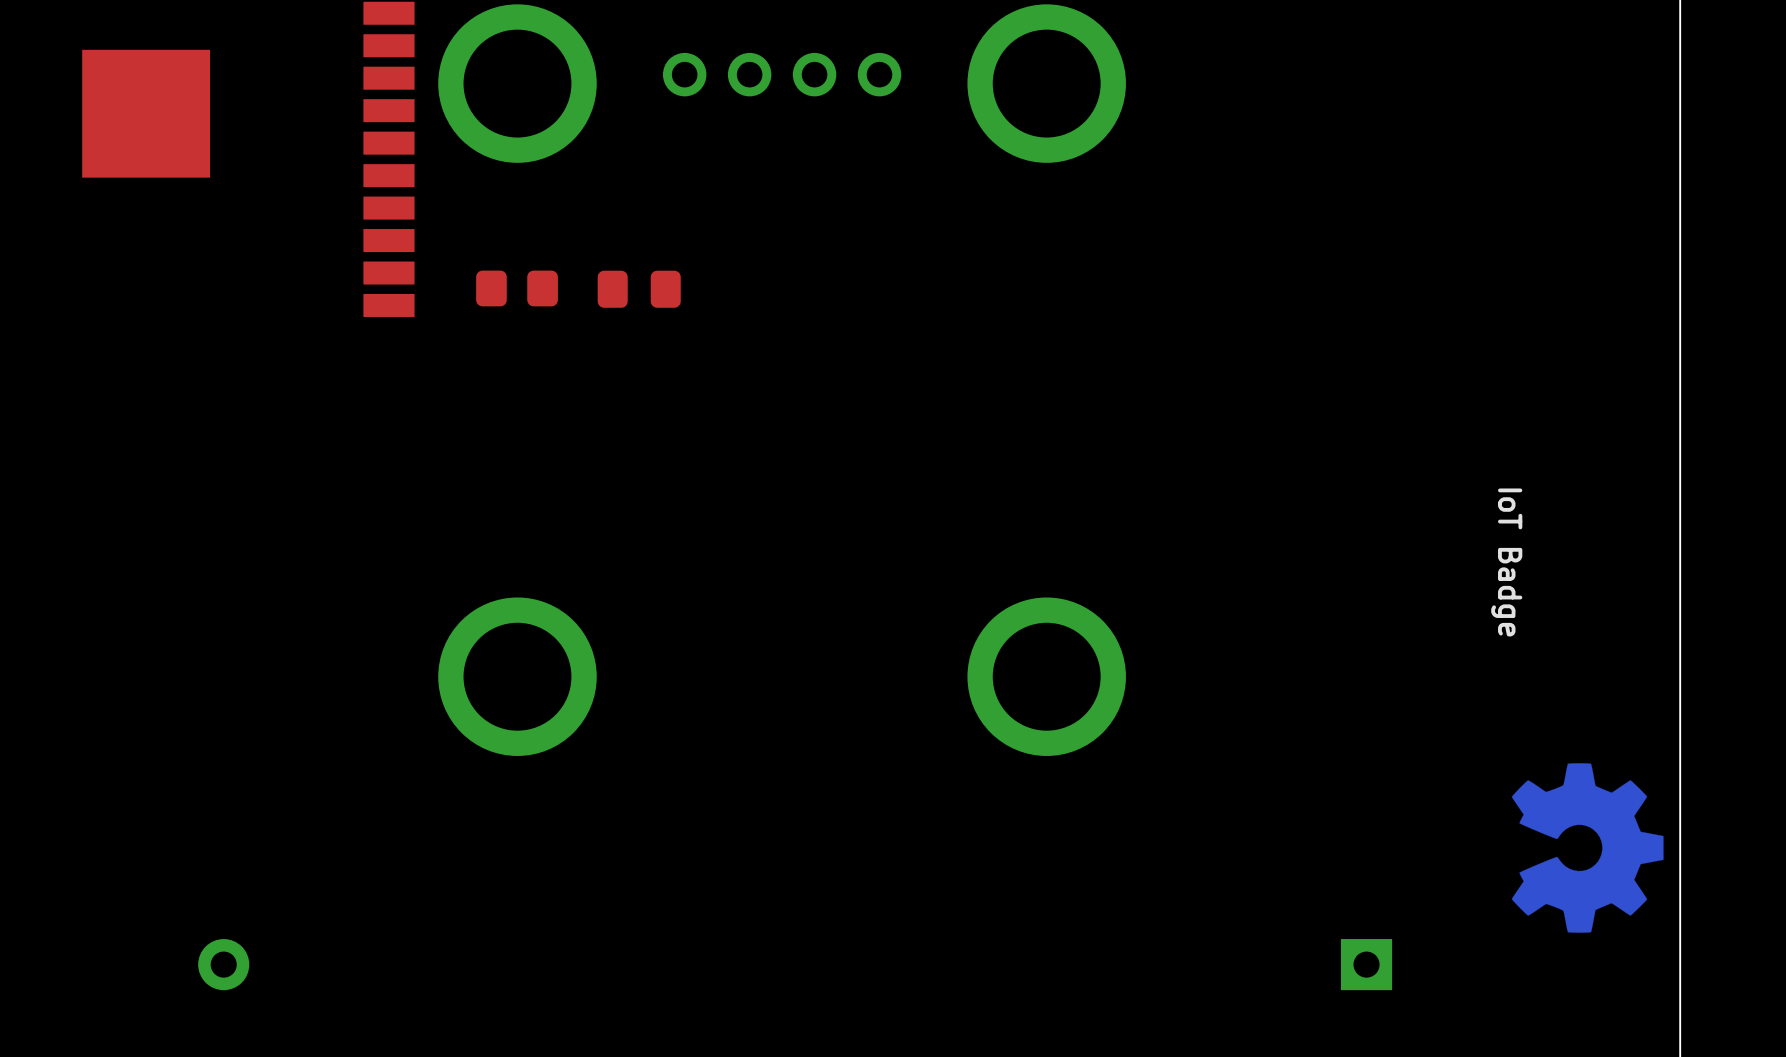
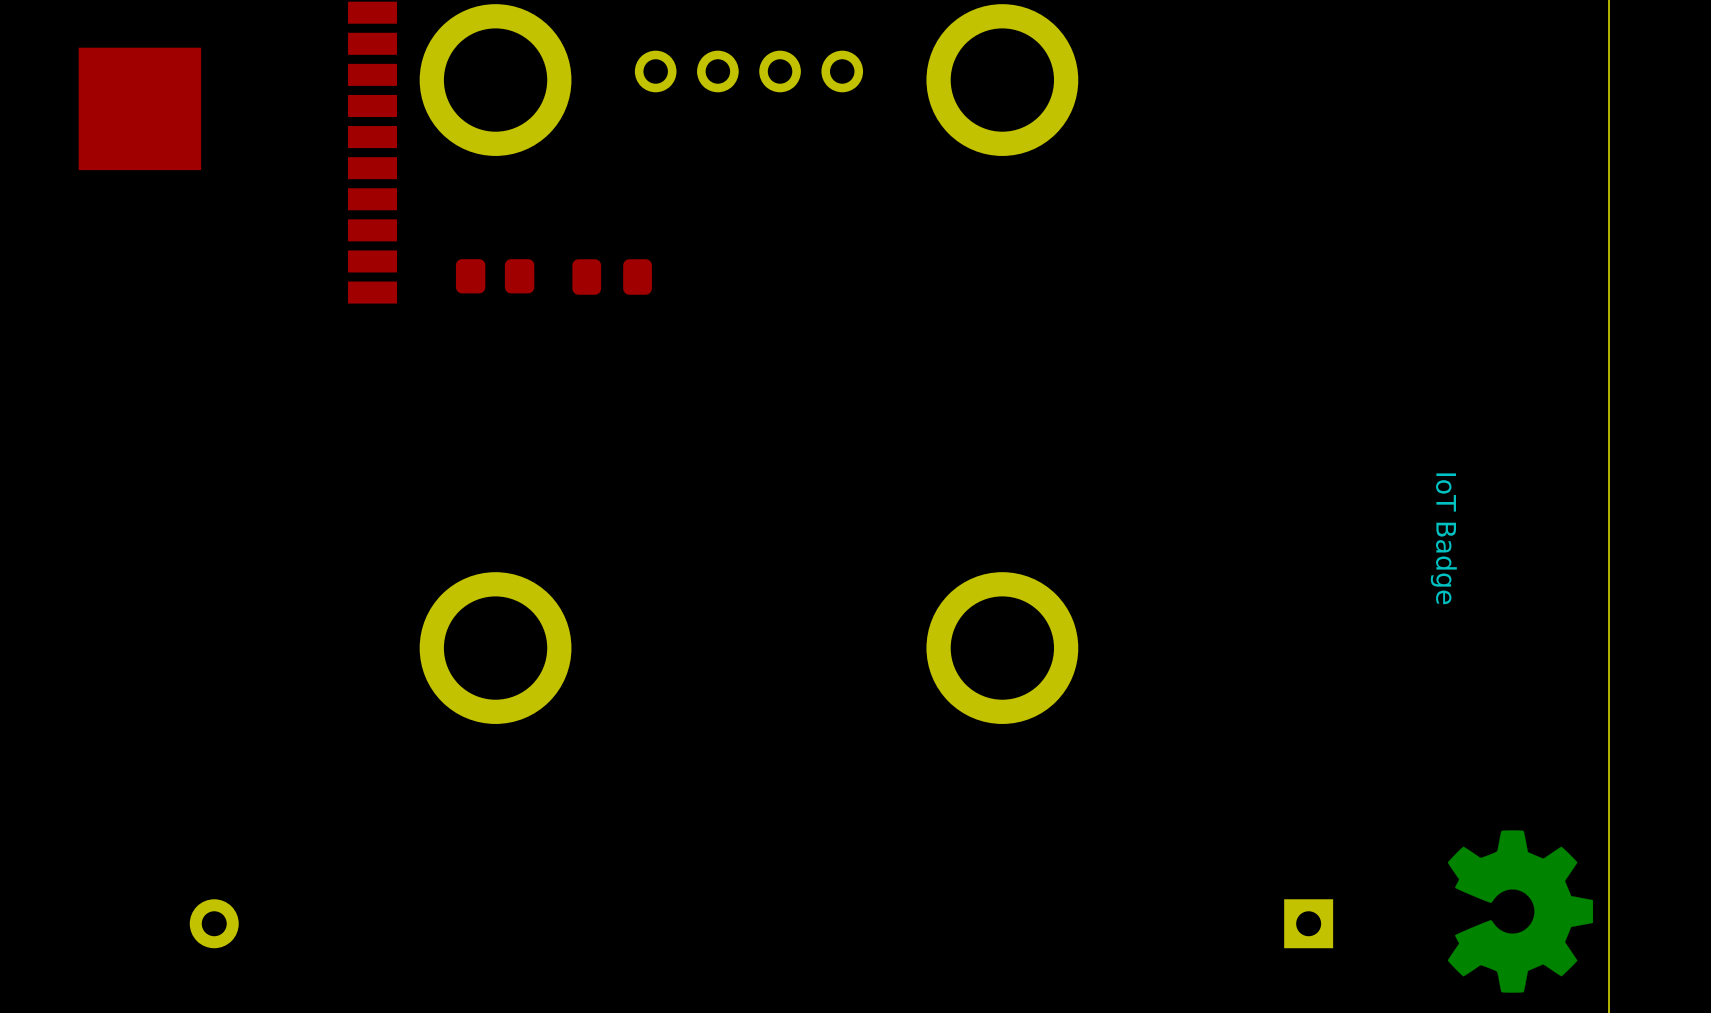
drawing position: (1587, 847) -> (1520, 911)

